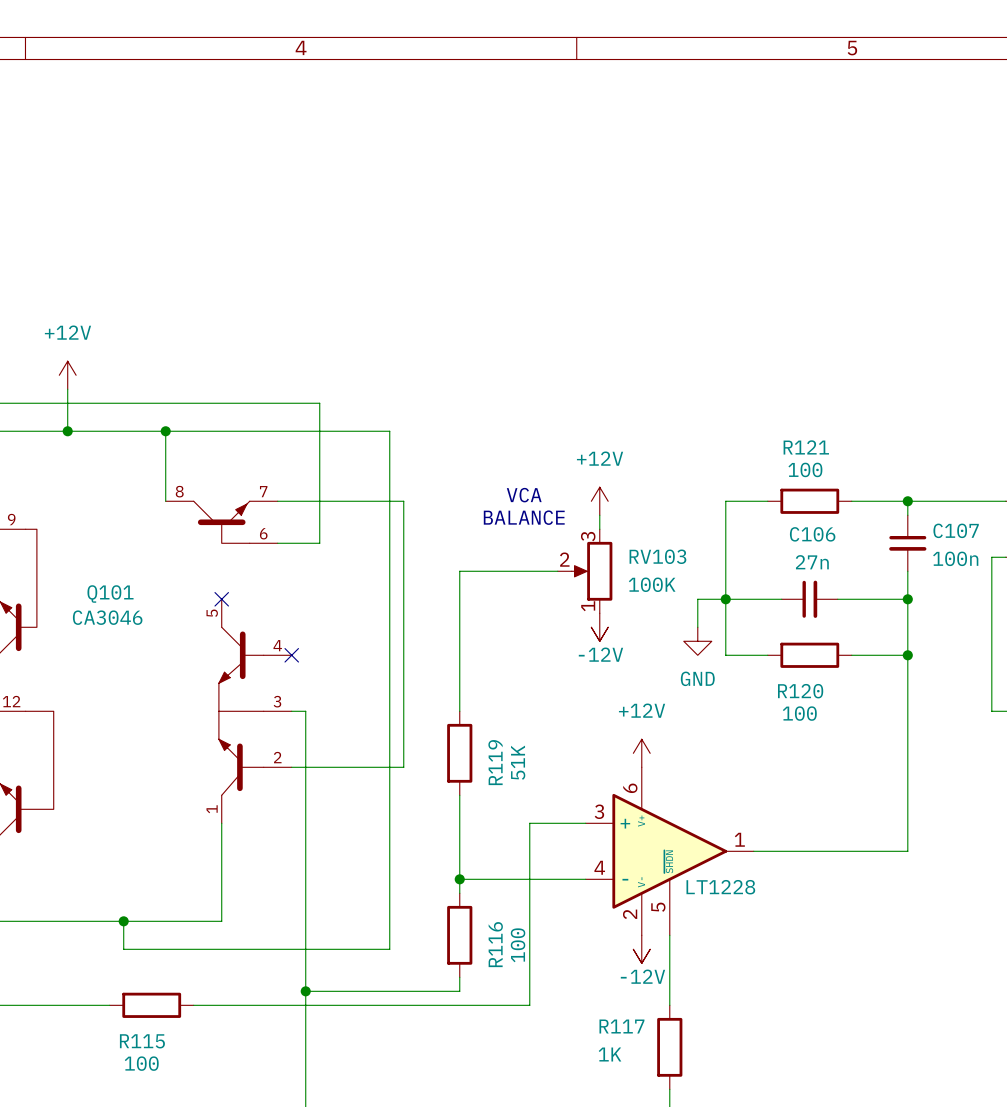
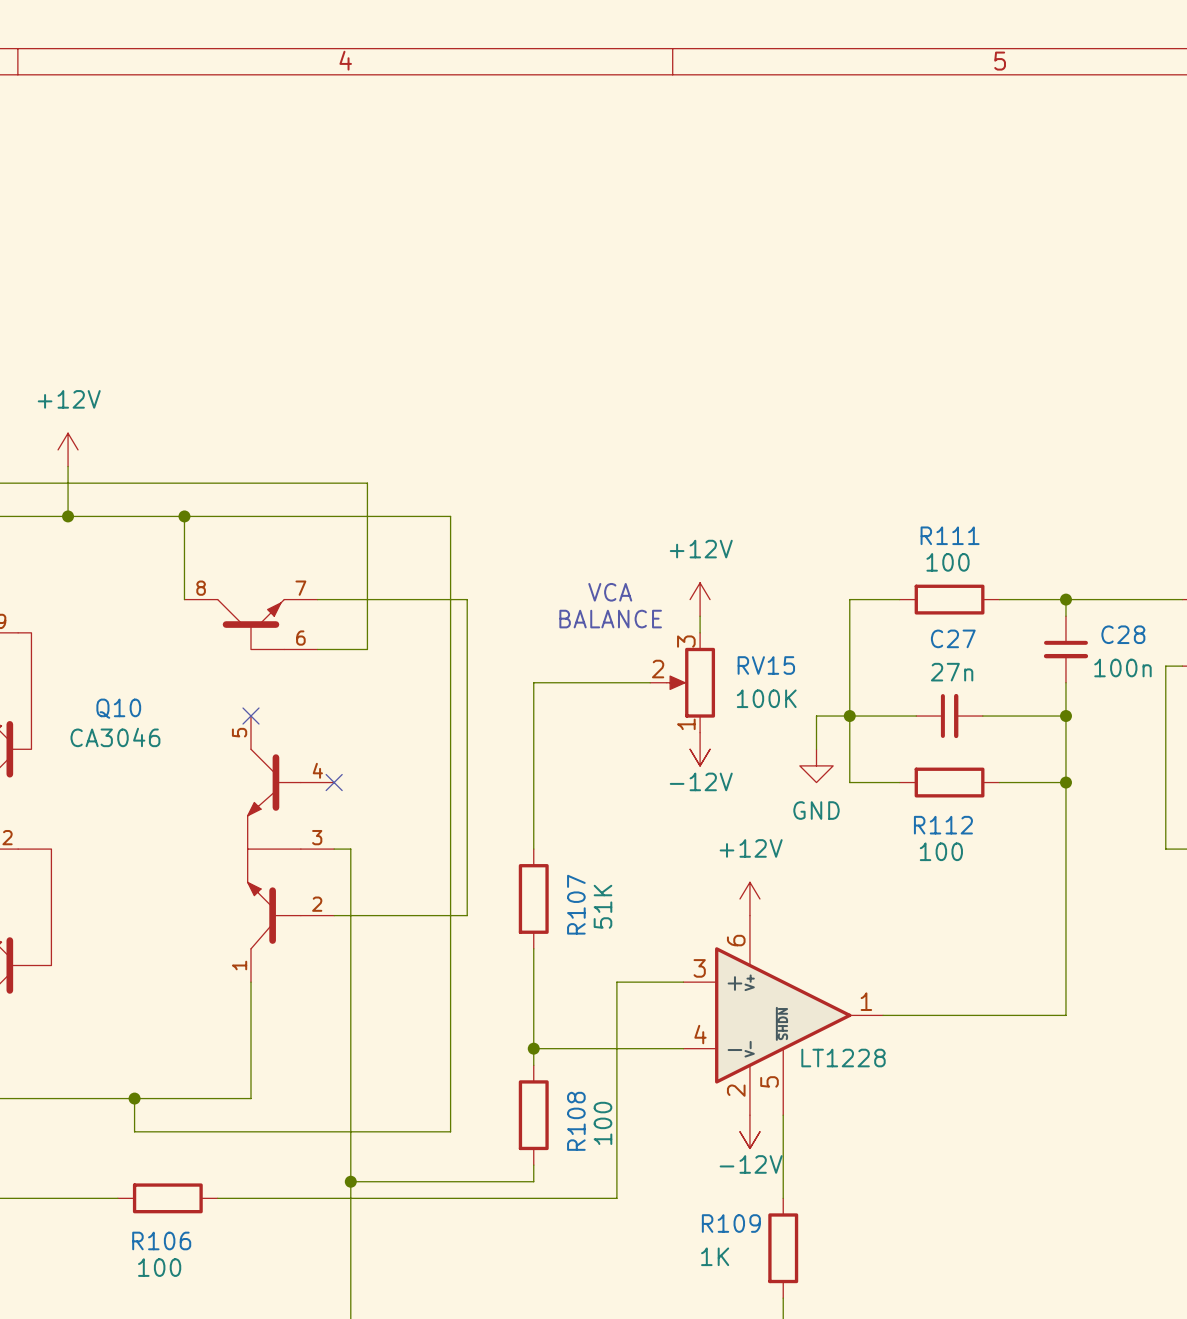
R121 name: R121 (806, 447) -> R111 (950, 535)
C107 name: C107 (956, 530) -> C28 (1123, 634)
C106 name: C106 (812, 534) -> C27 (953, 638)
RV103 name: RV103 (657, 556) -> RV15 (766, 665)
Q101 name: Q101 (110, 593) -> Q10 (118, 708)
R120 name: R120 (800, 691) -> R112 (943, 825)
R119 name: R119 (495, 762) -> R107 (576, 904)
R116 name: R116 (495, 944) -> R108 (576, 1121)
R117 name: R117 (621, 1026) -> R109 (731, 1223)
R115 name: R115 (142, 1041) -> R106 (161, 1240)

